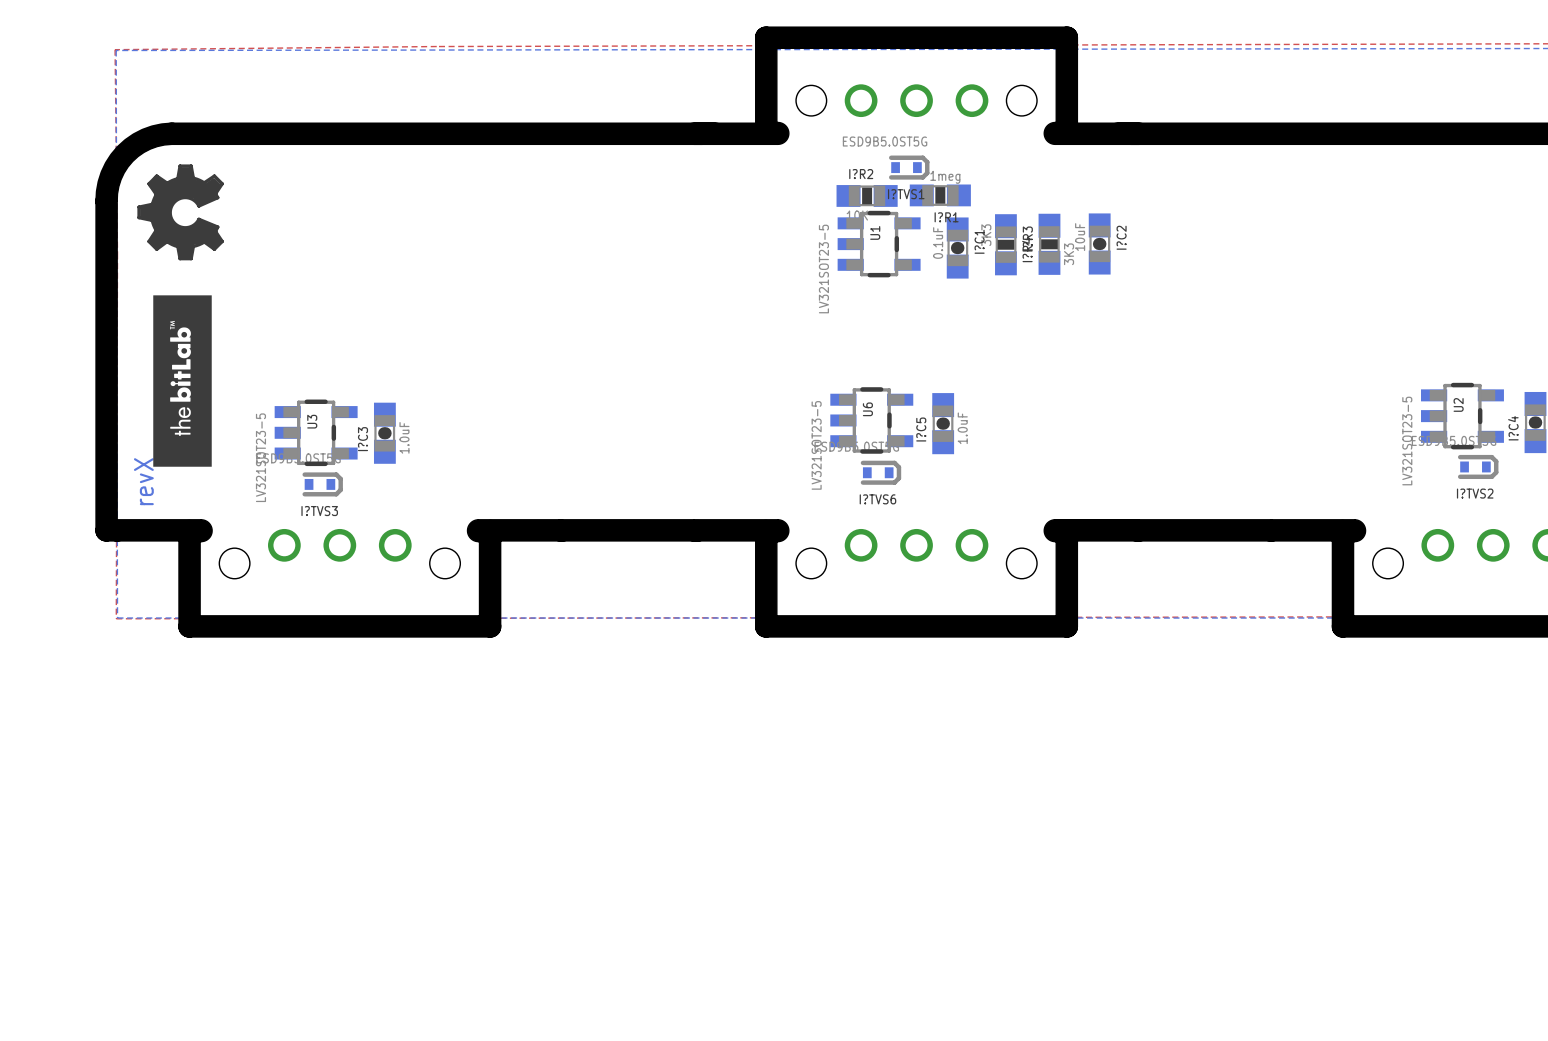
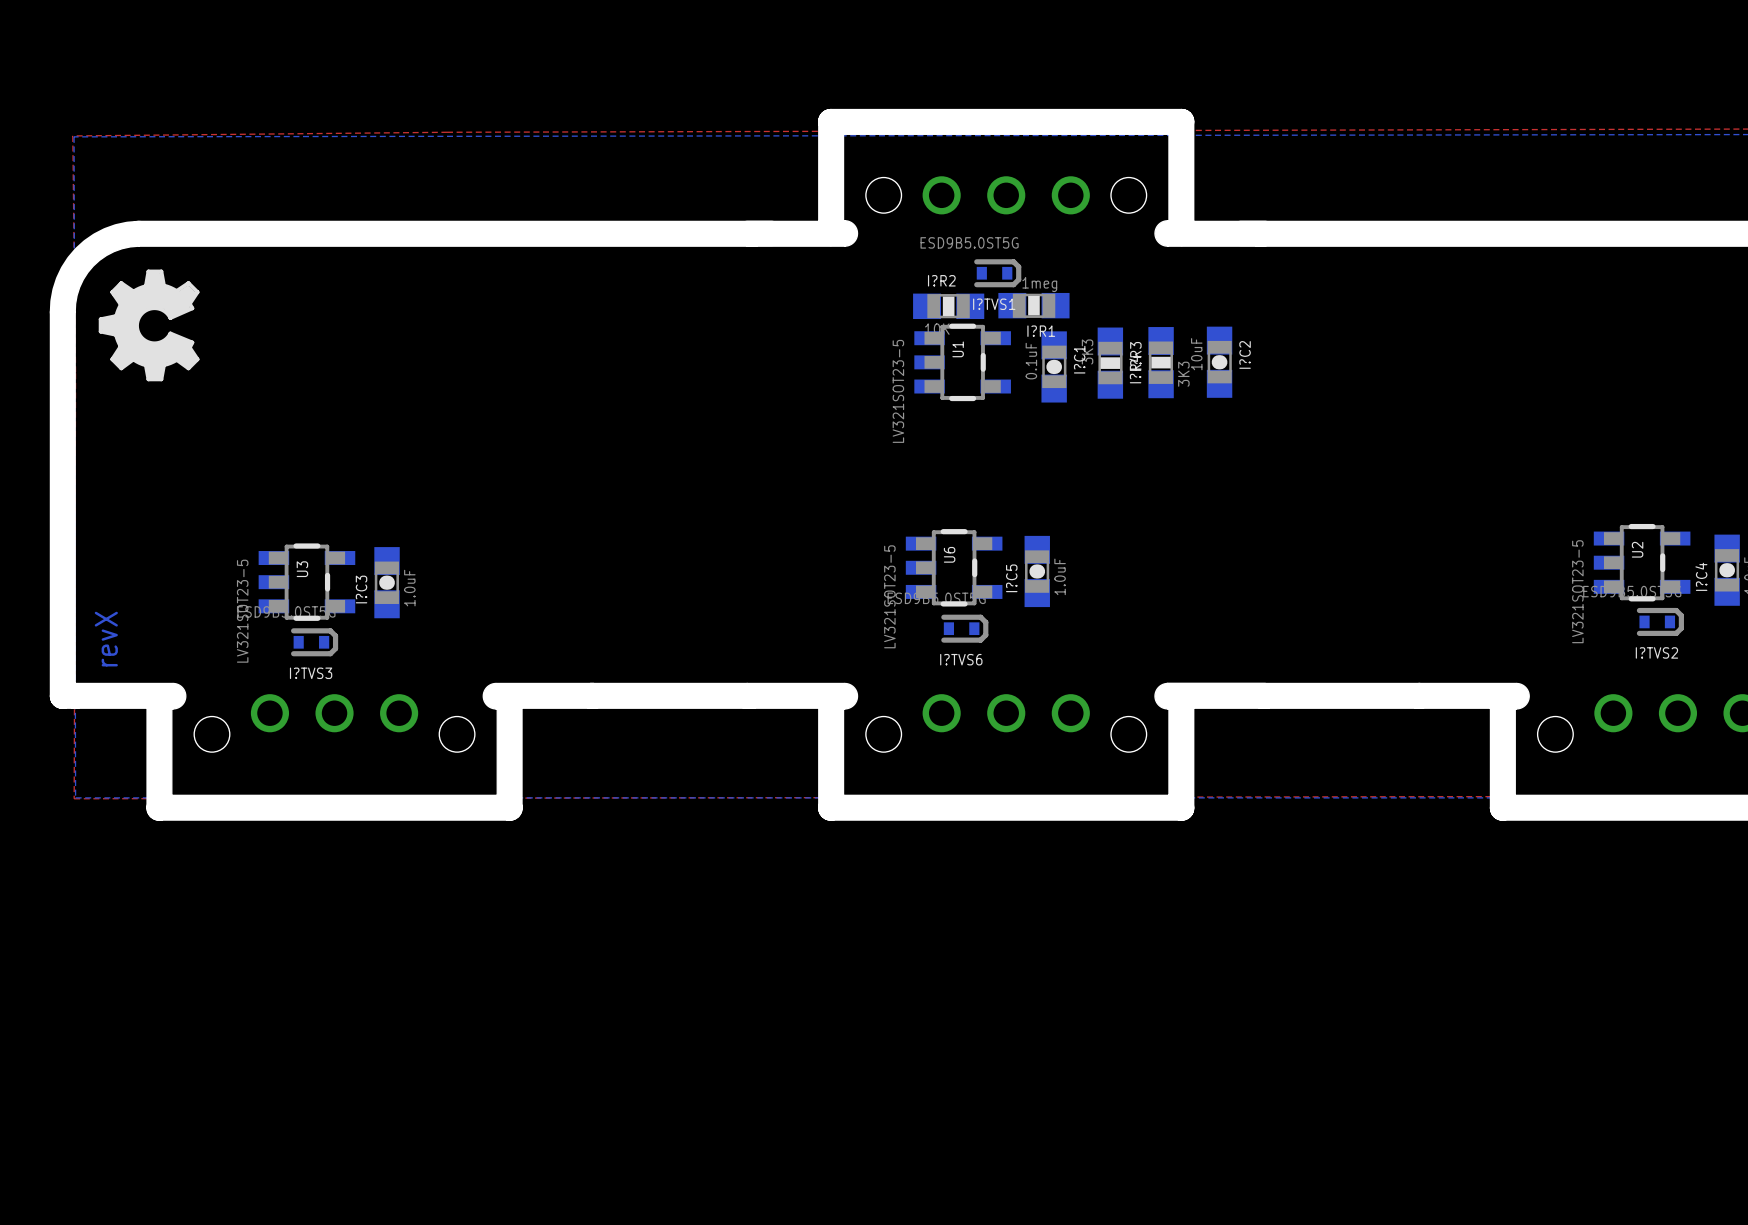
drawing: [153, 295, 212, 467] -> none

